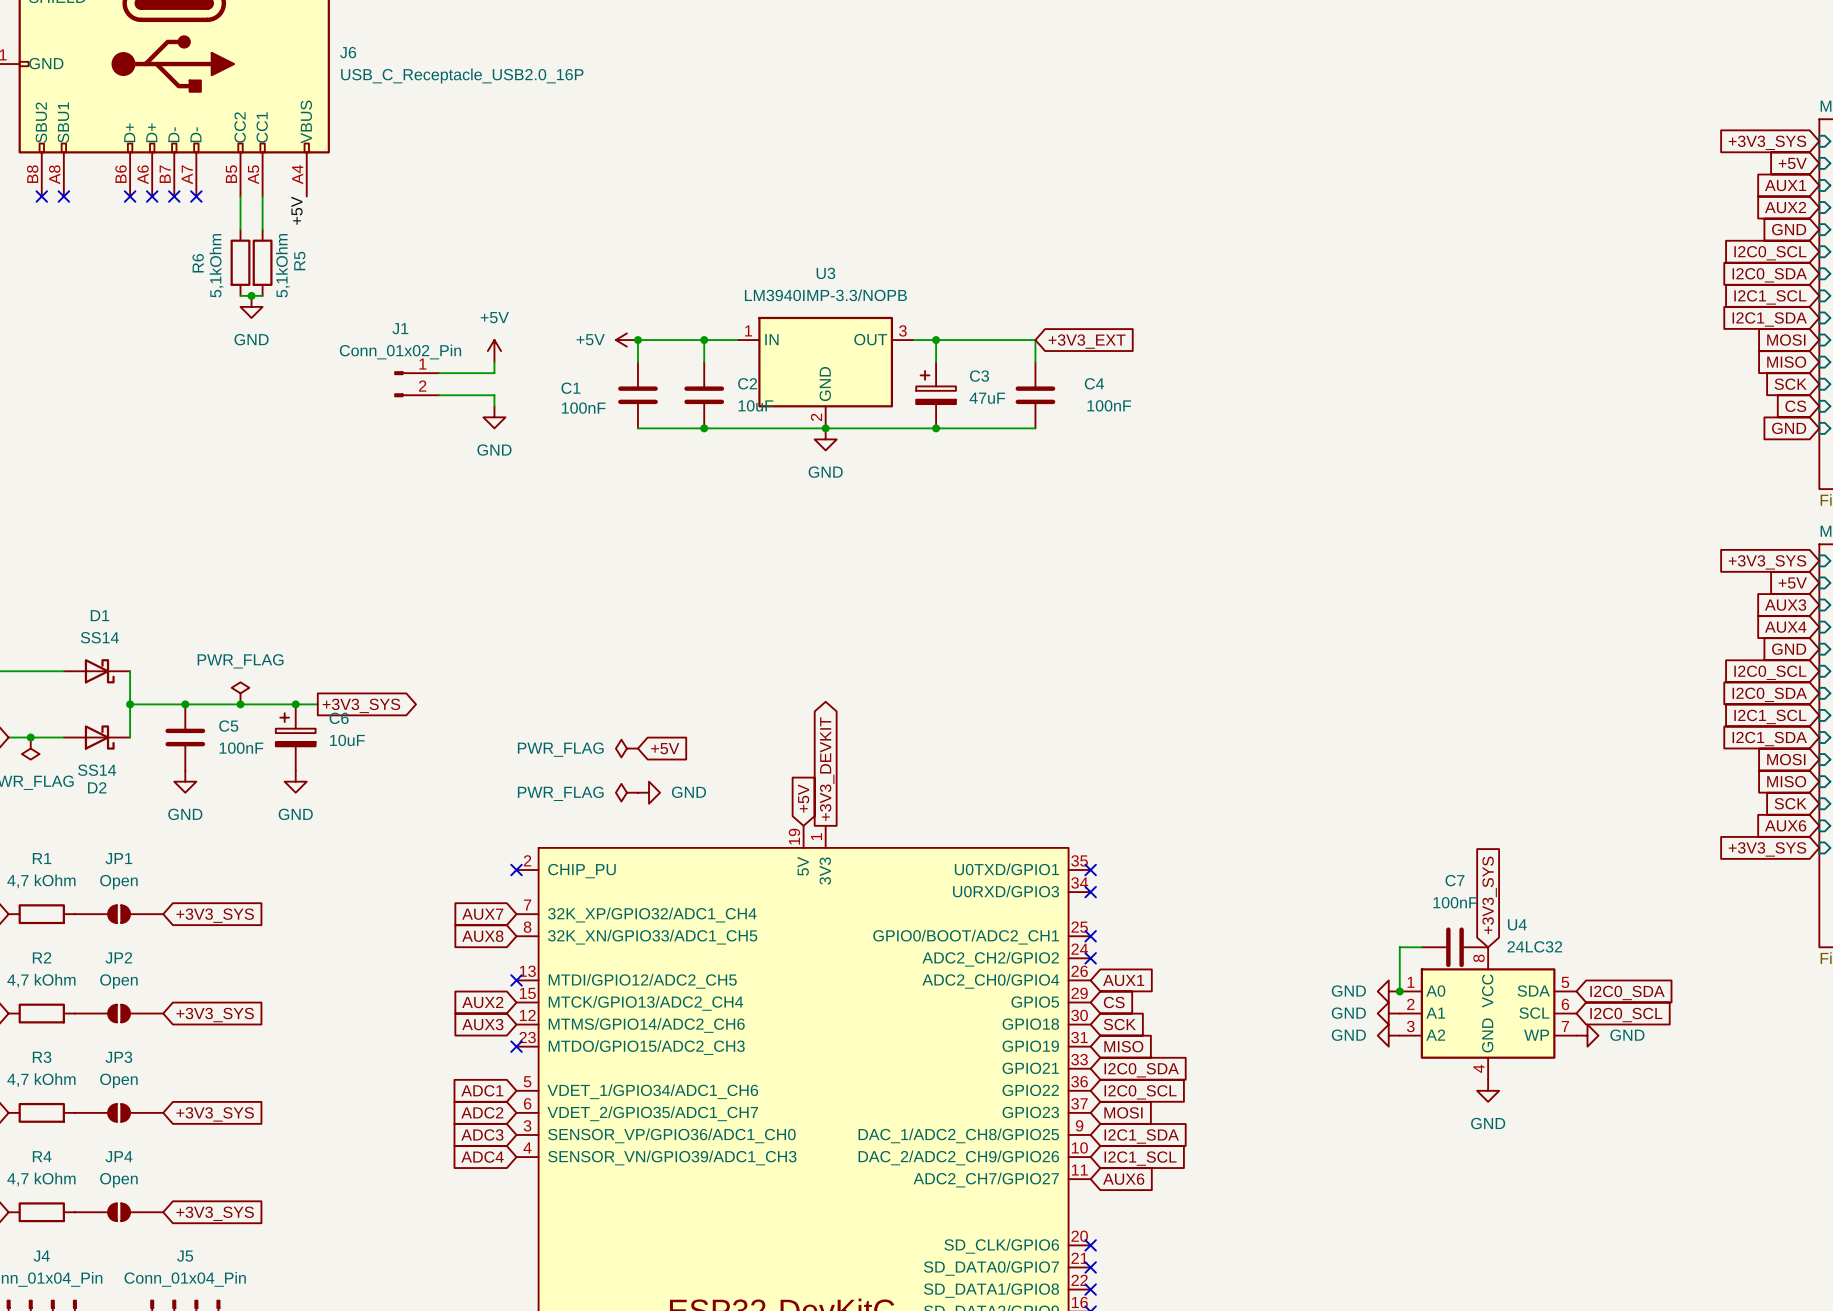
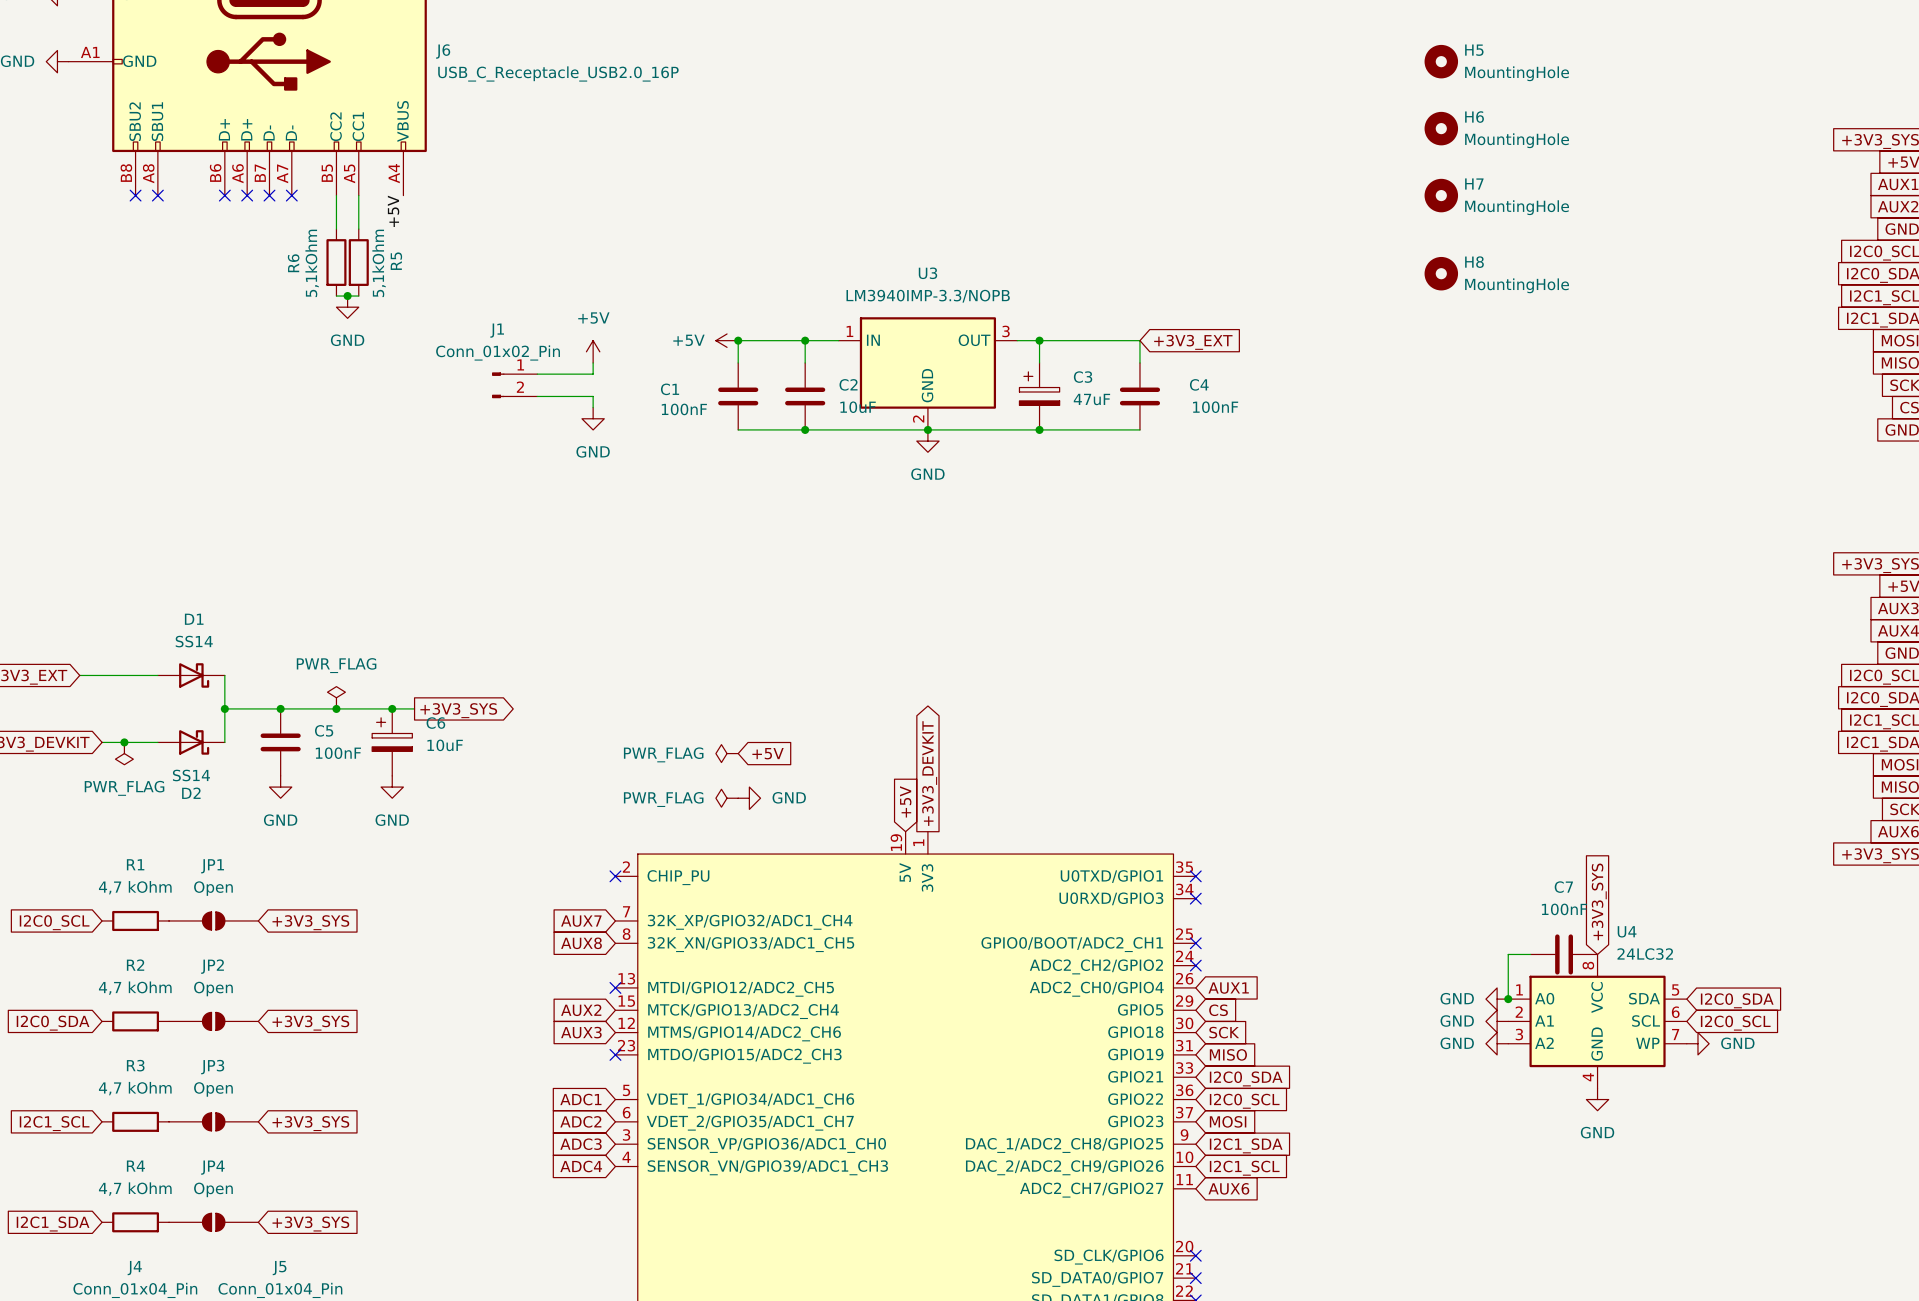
H5: none -> MountingHole (1441, 61)
H6: none -> MountingHole (1441, 128)
H7: none -> MountingHole (1441, 195)
H8: none -> MountingHole (1441, 273)

